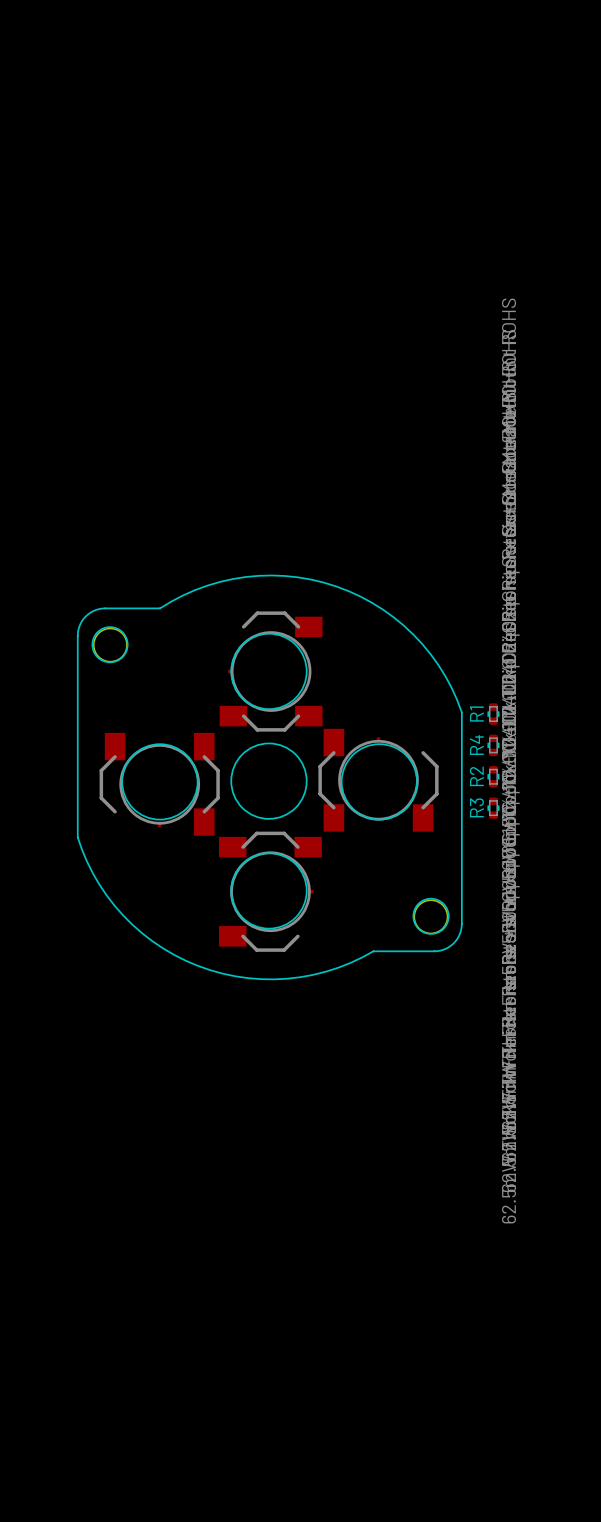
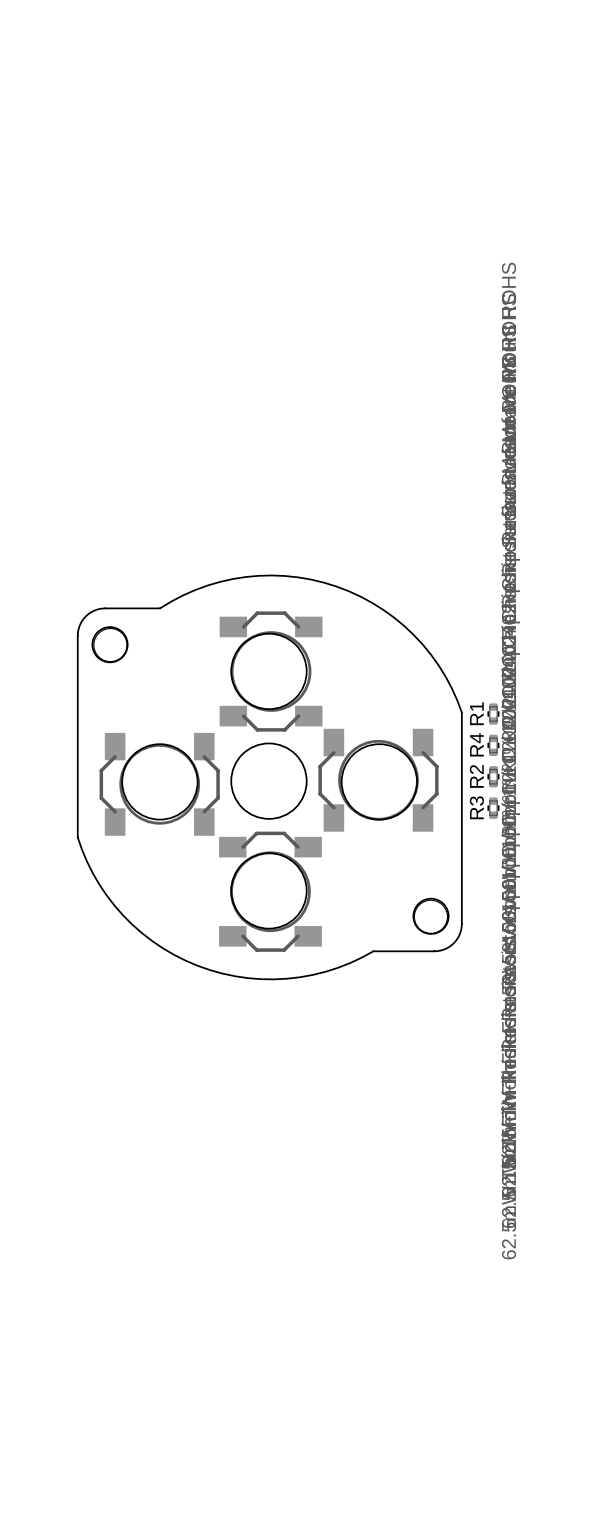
part footprint: [219, 611, 323, 732] -> [219, 611, 323, 732]
part footprint: [318, 728, 439, 832] -> [318, 728, 439, 832]
part footprint: [99, 732, 220, 836] -> [99, 732, 220, 836]
part footprint: [219, 831, 322, 952] -> [219, 831, 322, 952]

